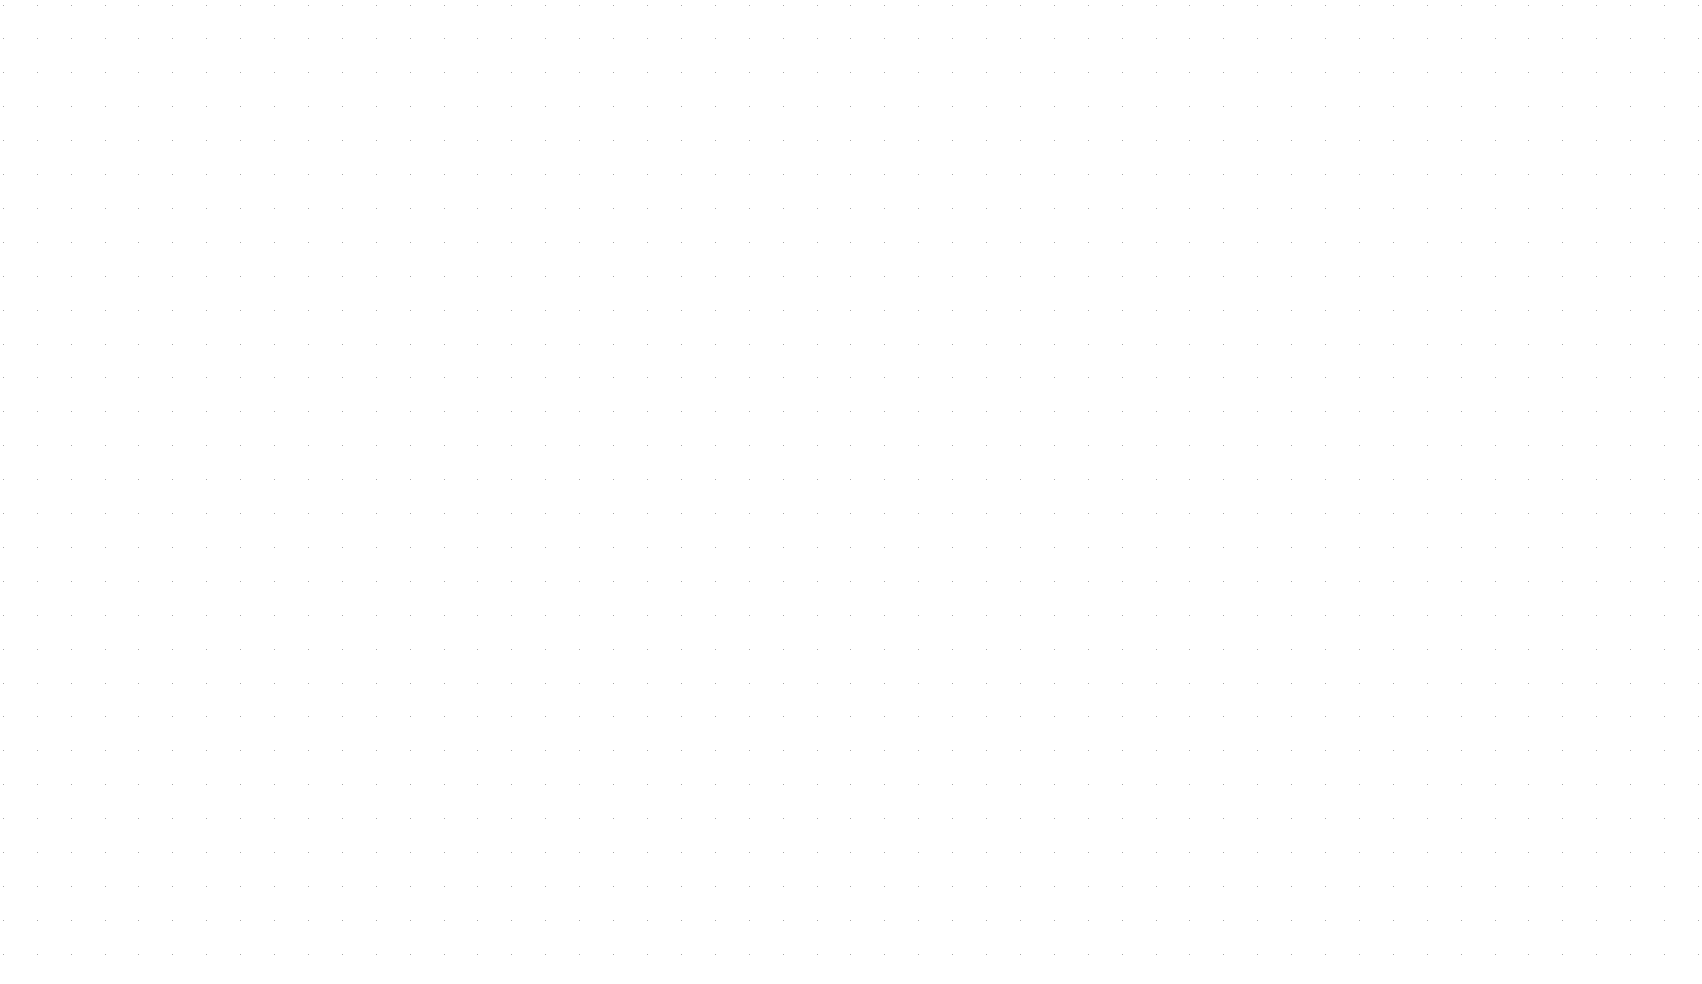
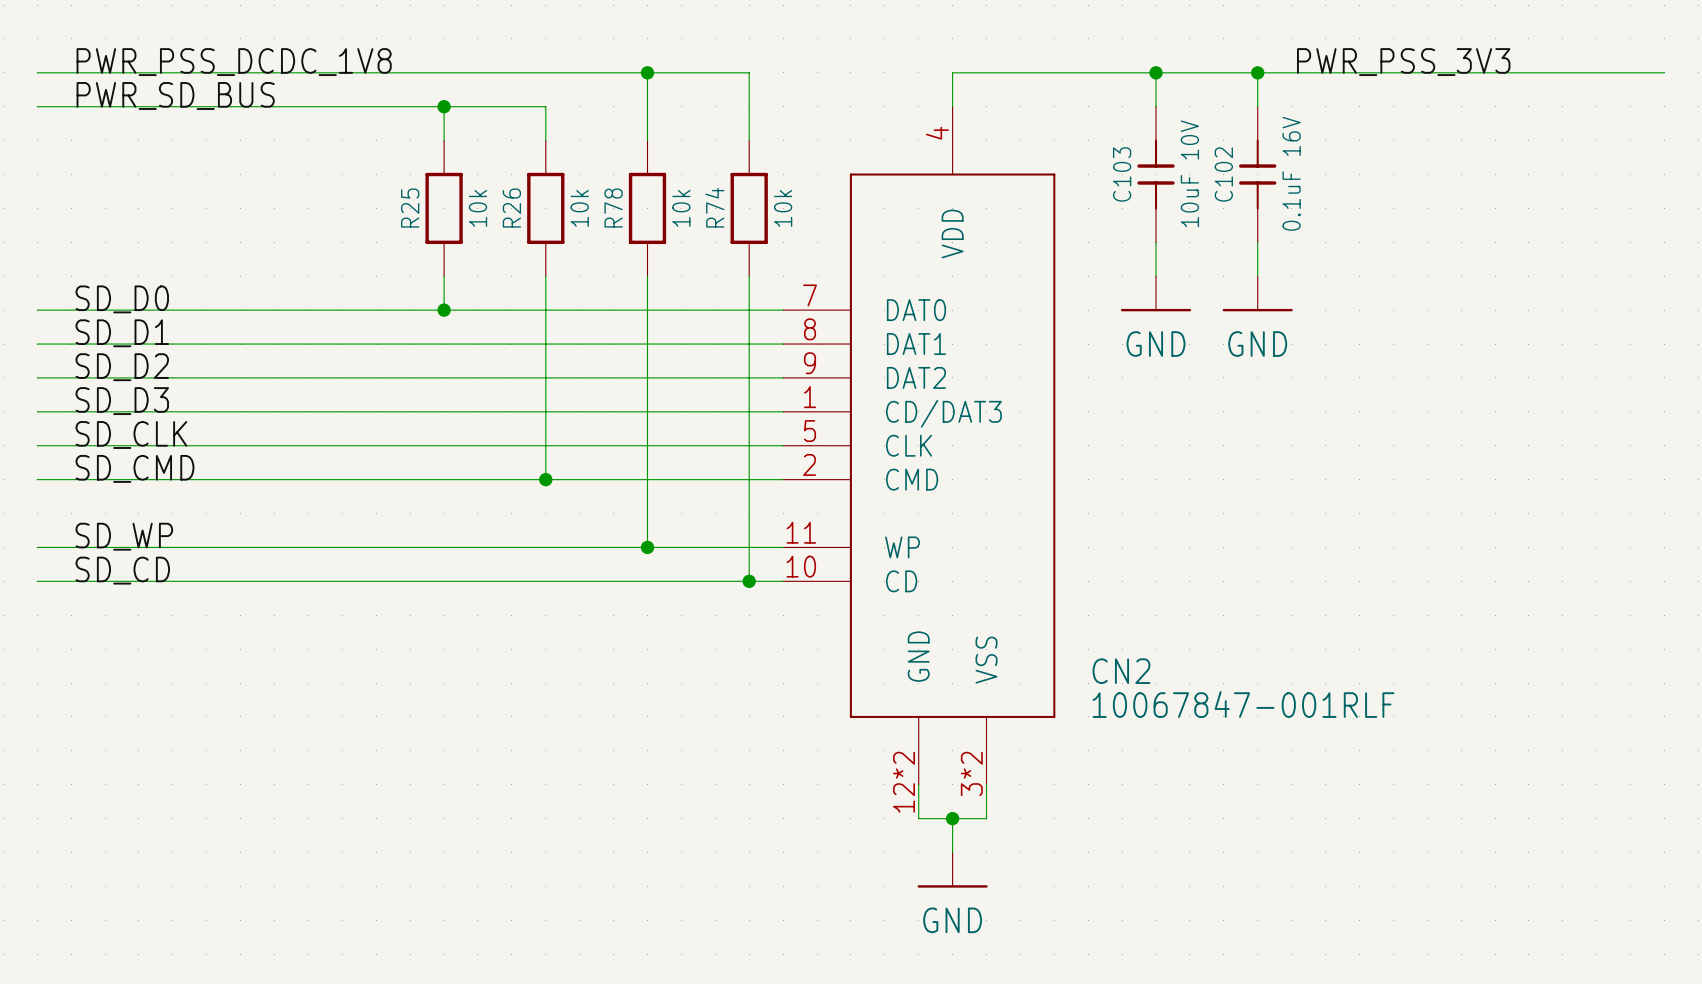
label: none -> PWR_PSS_DCDC_1V8 (234, 62)
label: none -> PWR_PSS_3V3 (1403, 62)
wire: none -> (37, 72) (749, 72) (749, 140)
wire: none -> (647, 72) (647, 140)
junction: none -> (647, 72)
wire: none -> (1156, 72) (1156, 106)
junction: none -> (1156, 72)
wire: none -> (1257, 72) (1257, 106)
junction: none -> (1257, 72)
wire: none -> (1664, 72) (952, 72) (952, 106)
label: none -> PWR_SD_BUS (175, 95)
wire: none -> (37, 106) (545, 106) (545, 140)
wire: none -> (444, 106) (444, 140)
junction: none -> (444, 106)
C103: none -> 10uF 10V (1156, 174)
C102: none -> 0.1uF 16V (1257, 174)
R25: none -> 10k (444, 208)
R26: none -> 10k (545, 208)
R78: none -> 10k (647, 208)
R74: none -> 10k (749, 208)
wire: none -> (1156, 242) (1156, 276)
wire: none -> (1257, 242) (1257, 276)
wire: none -> (444, 276) (444, 310)
wire: none -> (545, 276) (545, 479)
wire: none -> (647, 276) (647, 547)
wire: none -> (749, 276) (749, 581)
power symbol: none -> GND (1156, 293)
power symbol: none -> GND (1257, 293)
label: none -> SD_D0 (122, 299)
wire: none -> (37, 310) (783, 310)
junction: none -> (444, 310)
label: none -> SD_D1 (122, 333)
wire: none -> (37, 344) (783, 344)
label: none -> SD_D2 (122, 367)
wire: none -> (37, 377) (783, 377)
label: none -> SD_D3 (122, 401)
wire: none -> (37, 411) (783, 411)
label: none -> SD_CLK (131, 434)
wire: none -> (37, 445) (783, 445)
CN2: none -> 10067847-001RLF (919, 445)
label: none -> SD_CMD (134, 468)
wire: none -> (37, 479) (783, 479)
junction: none -> (545, 479)
label: none -> SD_WP (124, 536)
wire: none -> (37, 547) (783, 547)
junction: none -> (647, 547)
label: none -> SD_CD (122, 570)
wire: none -> (37, 581) (783, 581)
junction: none -> (749, 581)
wire: none -> (918, 784) (918, 818) (986, 818) (986, 784)
wire: none -> (952, 818) (952, 852)
junction: none -> (952, 818)
power symbol: none -> GND (952, 870)

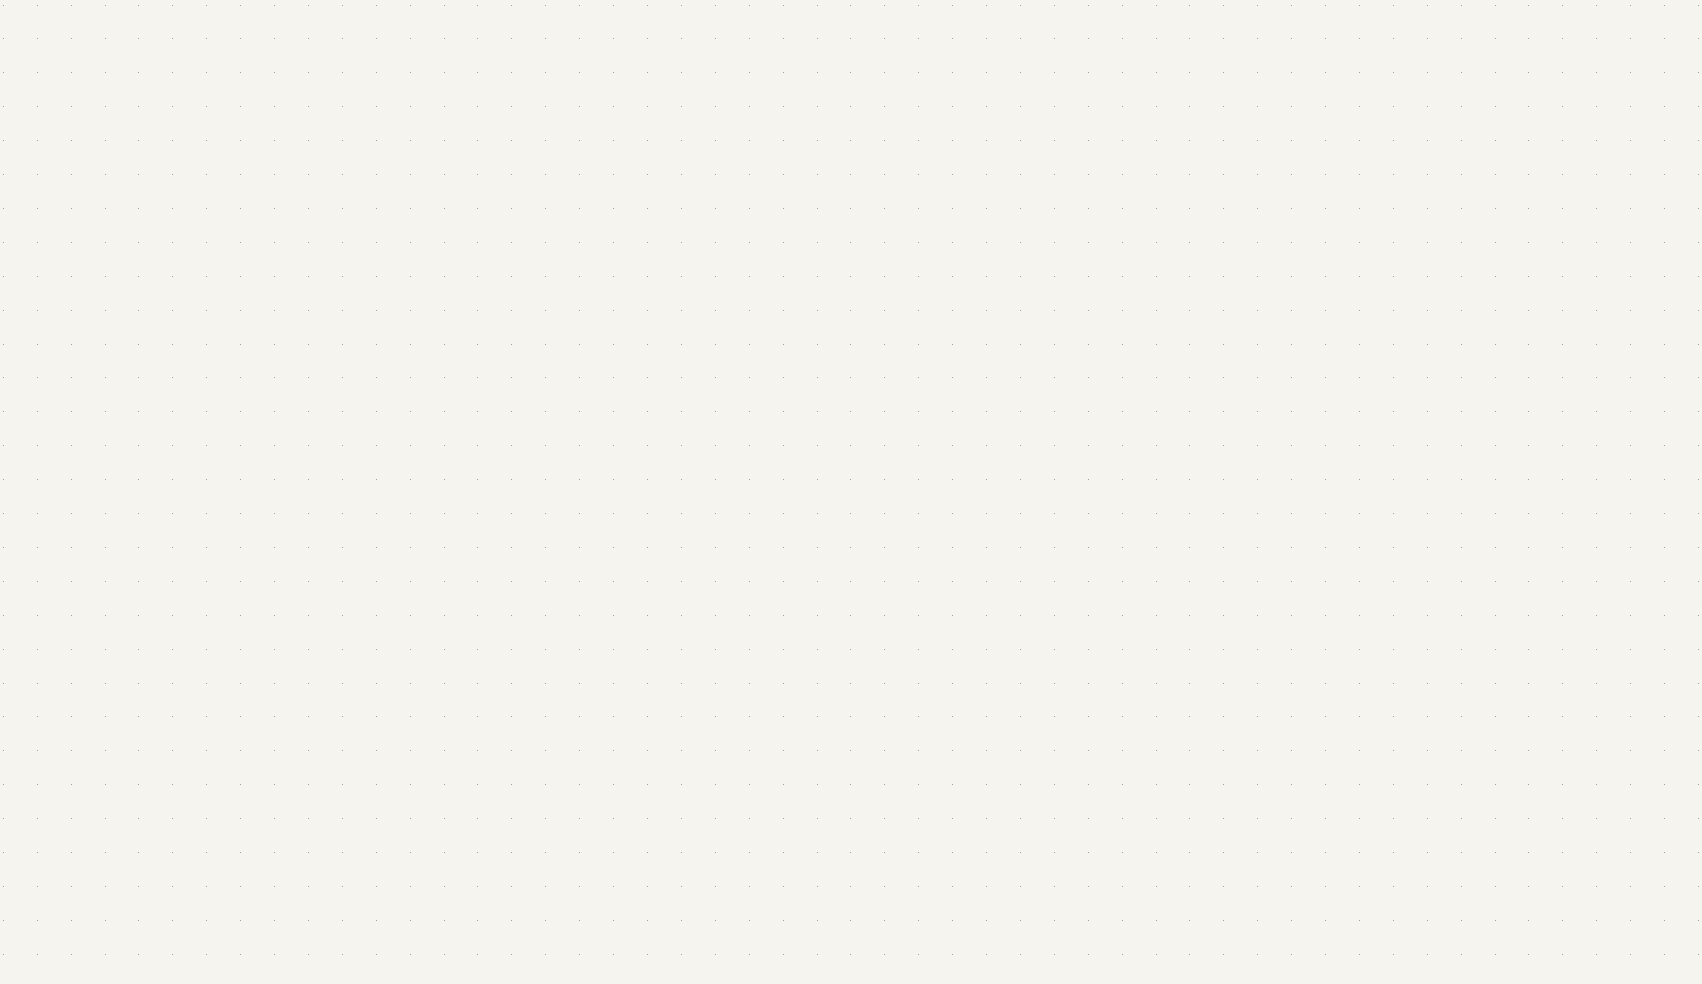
label: PWR_PSS_DCDC_1V8 (234, 62) -> none
label: PWR_PSS_3V3 (1403, 62) -> none
wire: (37, 72) (749, 72) (749, 140) -> none
wire: (647, 72) (647, 140) -> none
junction: (647, 72) -> none
wire: (1156, 72) (1156, 106) -> none
junction: (1156, 72) -> none
wire: (1257, 72) (1257, 106) -> none
junction: (1257, 72) -> none
wire: (1664, 72) (952, 72) (952, 106) -> none
label: PWR_SD_BUS (175, 95) -> none
wire: (37, 106) (545, 106) (545, 140) -> none
wire: (444, 106) (444, 140) -> none
junction: (444, 106) -> none
C103: 10uF 10V (1156, 174) -> none
C102: 0.1uF 16V (1257, 174) -> none
R25: 10k (444, 208) -> none
R26: 10k (545, 208) -> none
R78: 10k (647, 208) -> none
R74: 10k (749, 208) -> none
wire: (1156, 242) (1156, 276) -> none
wire: (1257, 242) (1257, 276) -> none
wire: (444, 276) (444, 310) -> none
wire: (545, 276) (545, 479) -> none
wire: (647, 276) (647, 547) -> none
wire: (749, 276) (749, 581) -> none
power symbol: GND (1156, 293) -> none
power symbol: GND (1257, 293) -> none
label: SD_D0 (122, 299) -> none
wire: (37, 310) (783, 310) -> none
junction: (444, 310) -> none
label: SD_D1 (122, 333) -> none
wire: (37, 344) (783, 344) -> none
label: SD_D2 (122, 367) -> none
wire: (37, 377) (783, 377) -> none
label: SD_D3 (122, 401) -> none
wire: (37, 411) (783, 411) -> none
label: SD_CLK (131, 434) -> none
wire: (37, 445) (783, 445) -> none
CN2: 10067847-001RLF (919, 445) -> none
label: SD_CMD (134, 468) -> none
wire: (37, 479) (783, 479) -> none
junction: (545, 479) -> none
label: SD_WP (124, 536) -> none
wire: (37, 547) (783, 547) -> none
junction: (647, 547) -> none
label: SD_CD (122, 570) -> none
wire: (37, 581) (783, 581) -> none
junction: (749, 581) -> none
wire: (918, 784) (918, 818) (986, 818) (986, 784) -> none
wire: (952, 818) (952, 852) -> none
junction: (952, 818) -> none
power symbol: GND (952, 870) -> none

